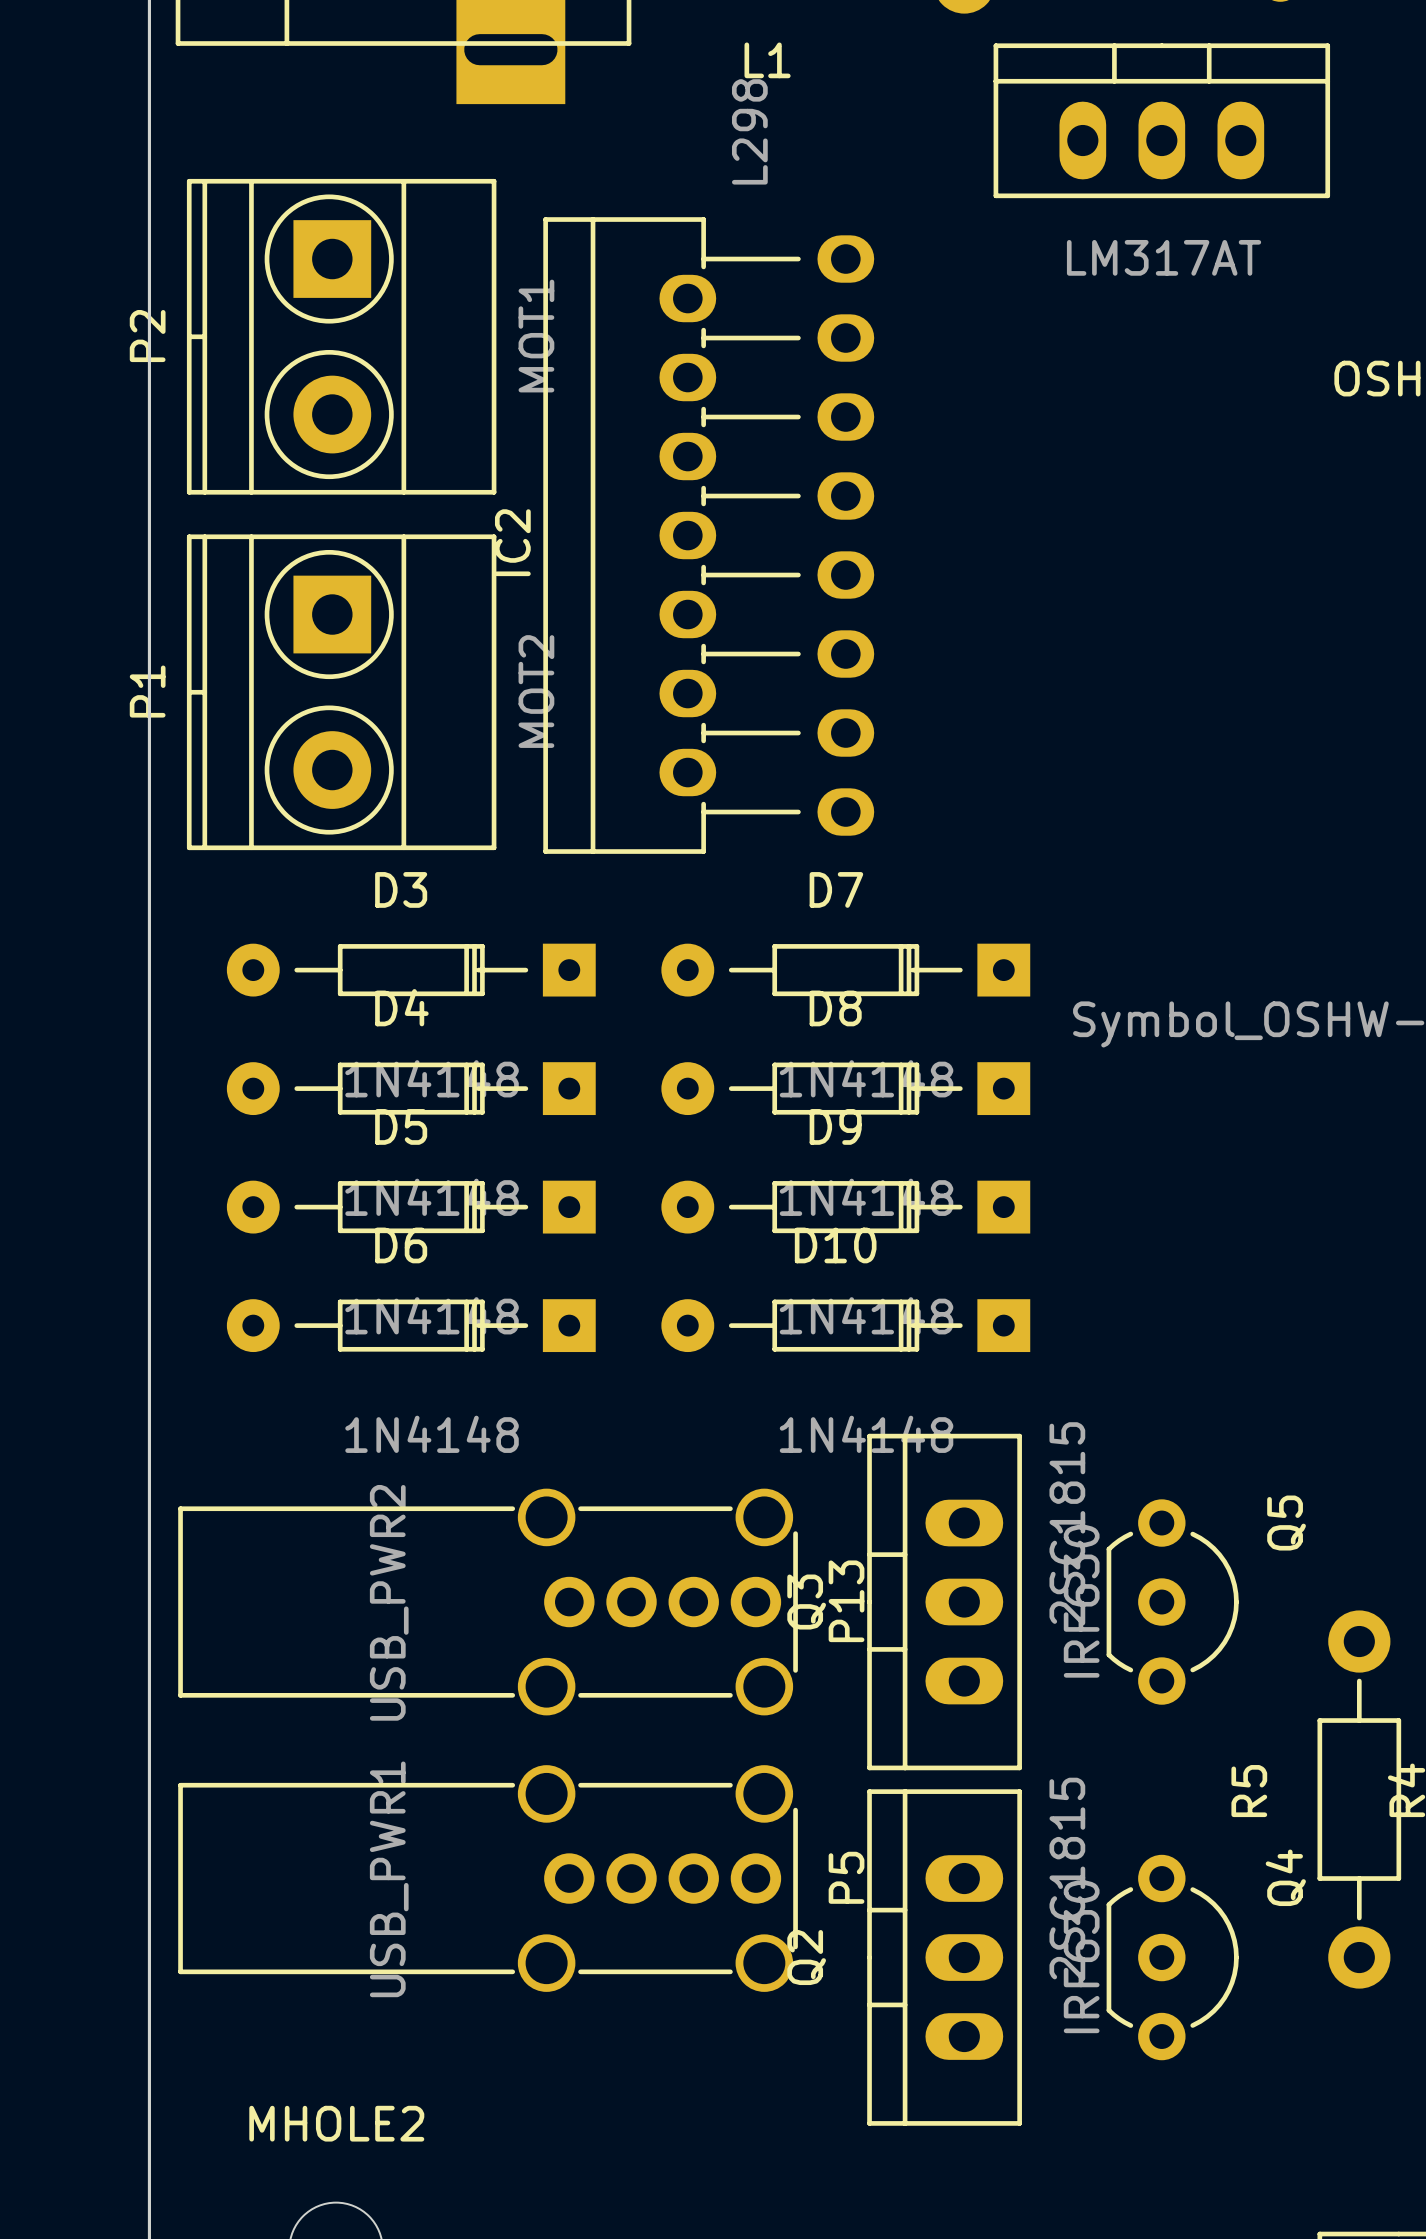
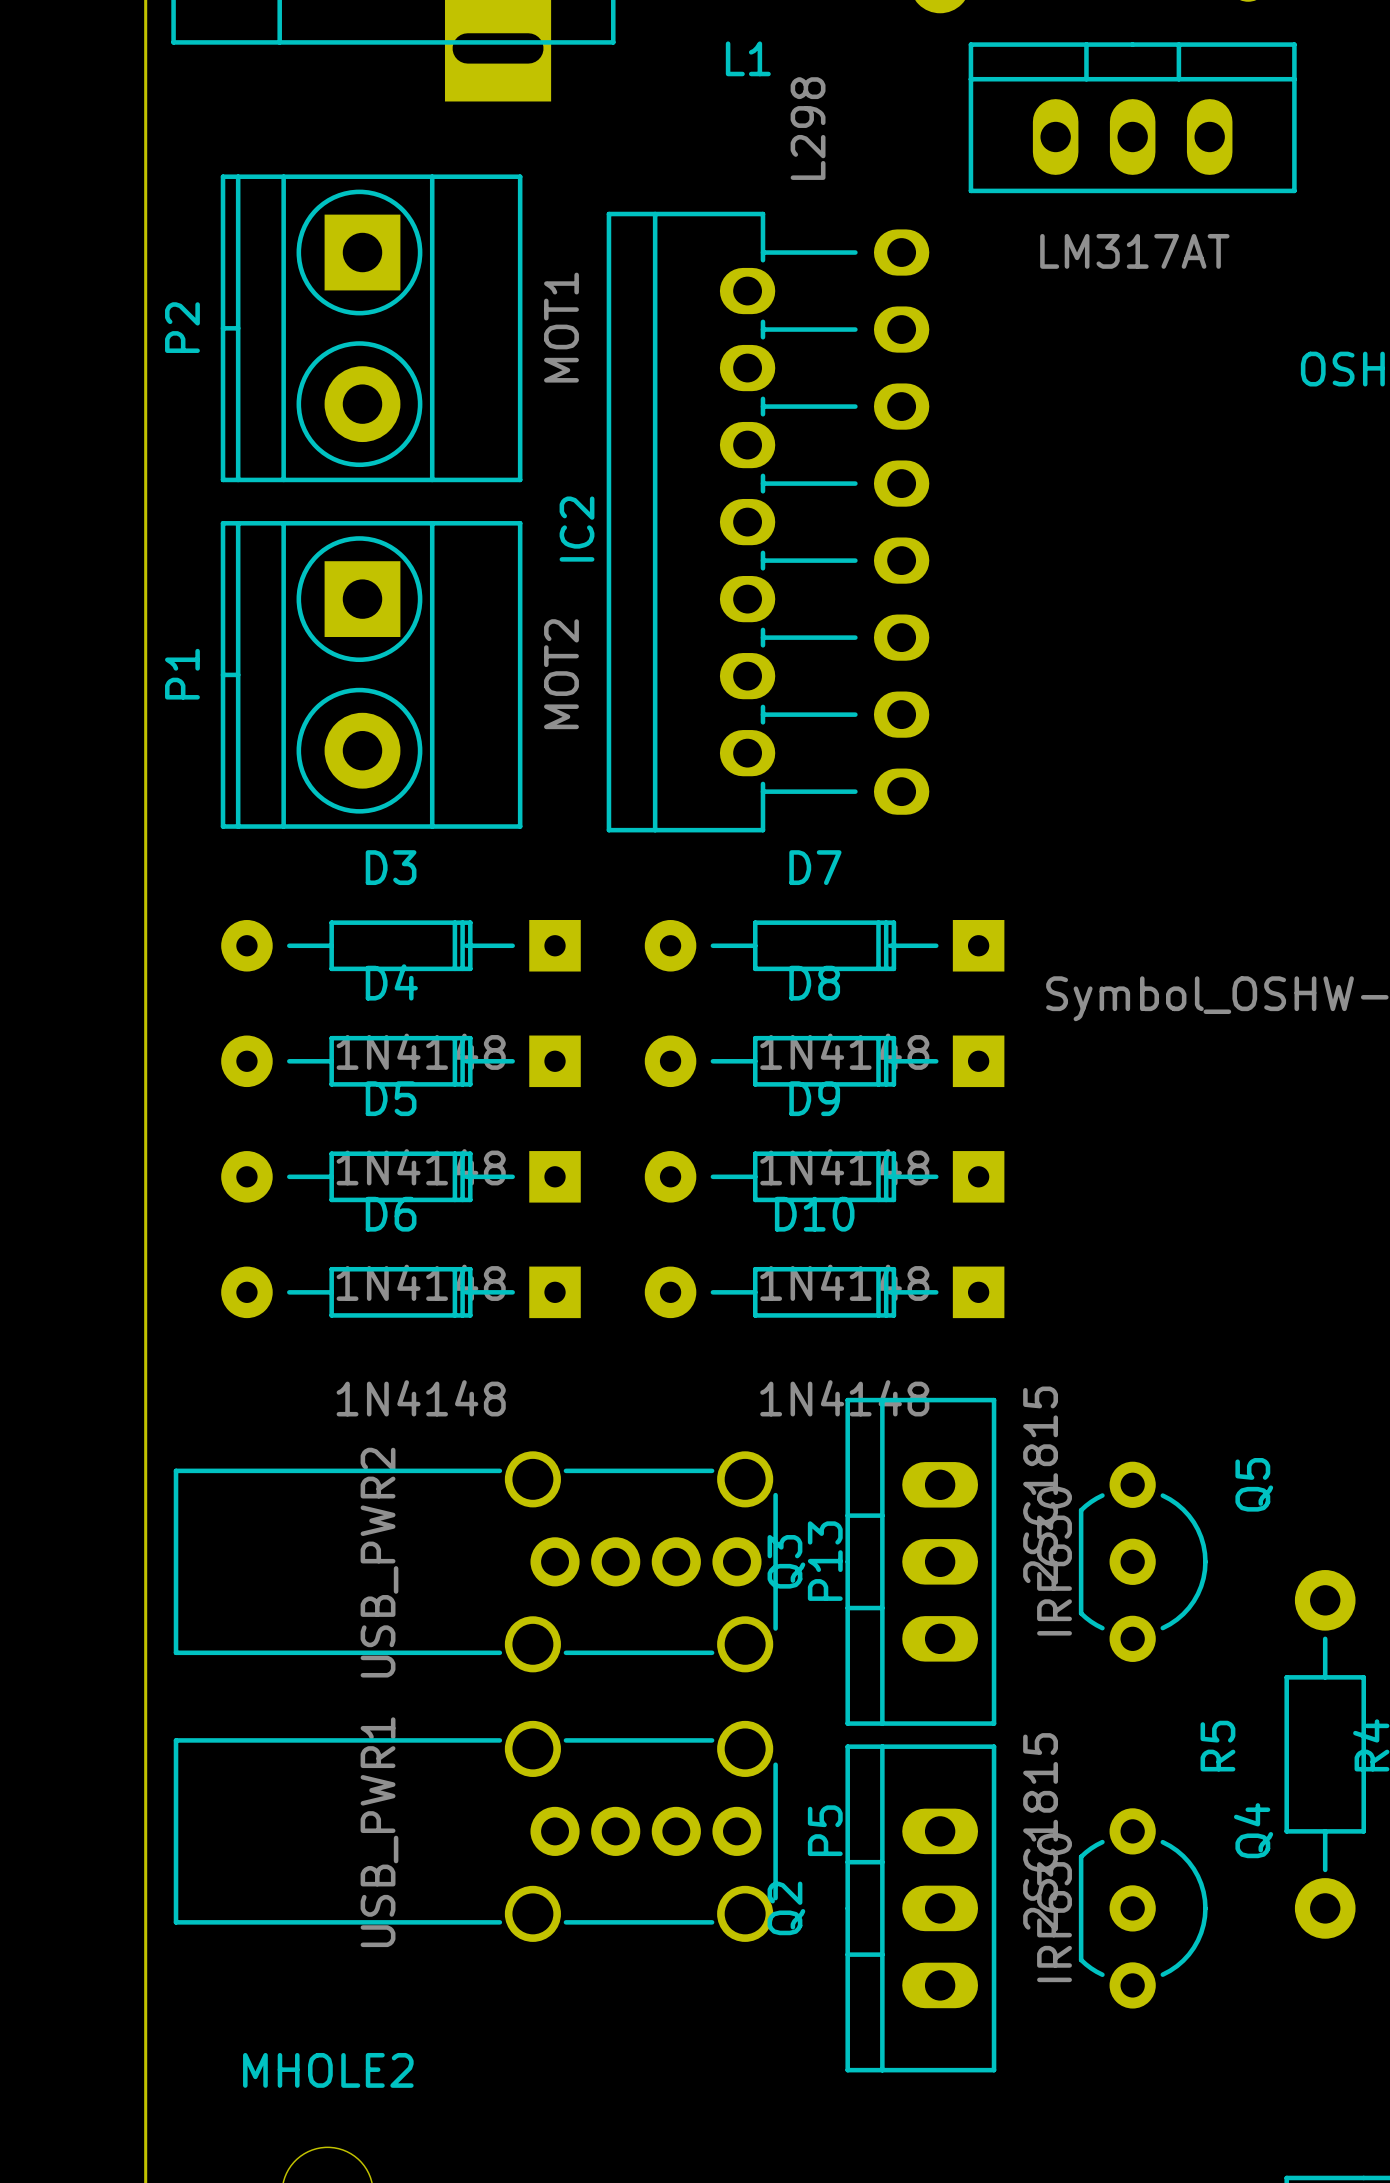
P2 position: (341, 336) -> (371, 328)
IC2 position: (708, 535) -> (767, 522)
P1 position: (341, 692) -> (371, 674)

